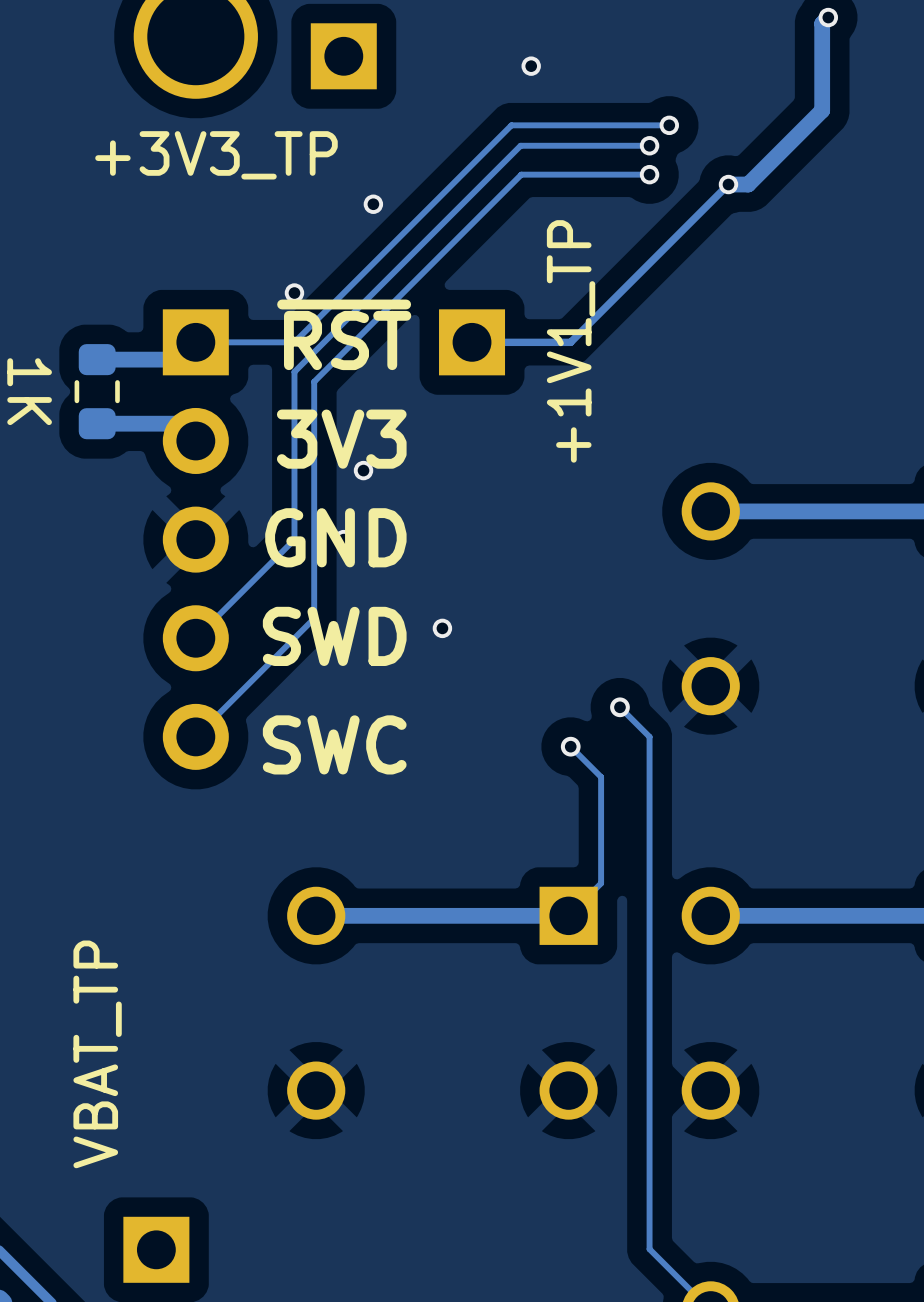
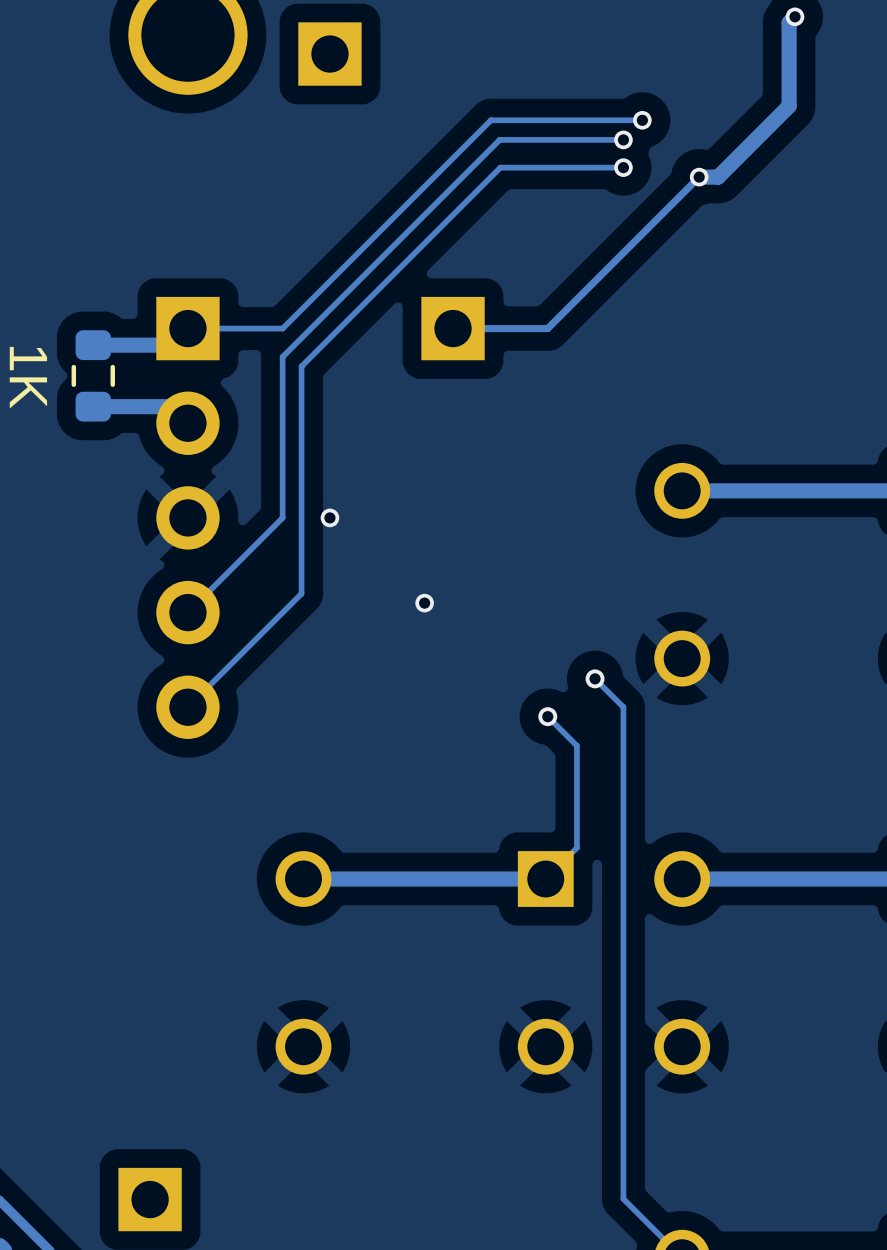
via: (531, 66) -> none
text: +3V3_TP (216, 155) -> none
via: (373, 204) -> none
via: (294, 293) -> none
text: ~{RST} (344, 334) -> none
text: +1V1_TP (571, 341) -> none
text: 3V3 (341, 439) -> none
via: (363, 470) -> none
text: GND (335, 537) -> none
text: SWD (334, 636) -> none
text: SWC (334, 744) -> none
text: VBAT_TP (97, 1054) -> none

